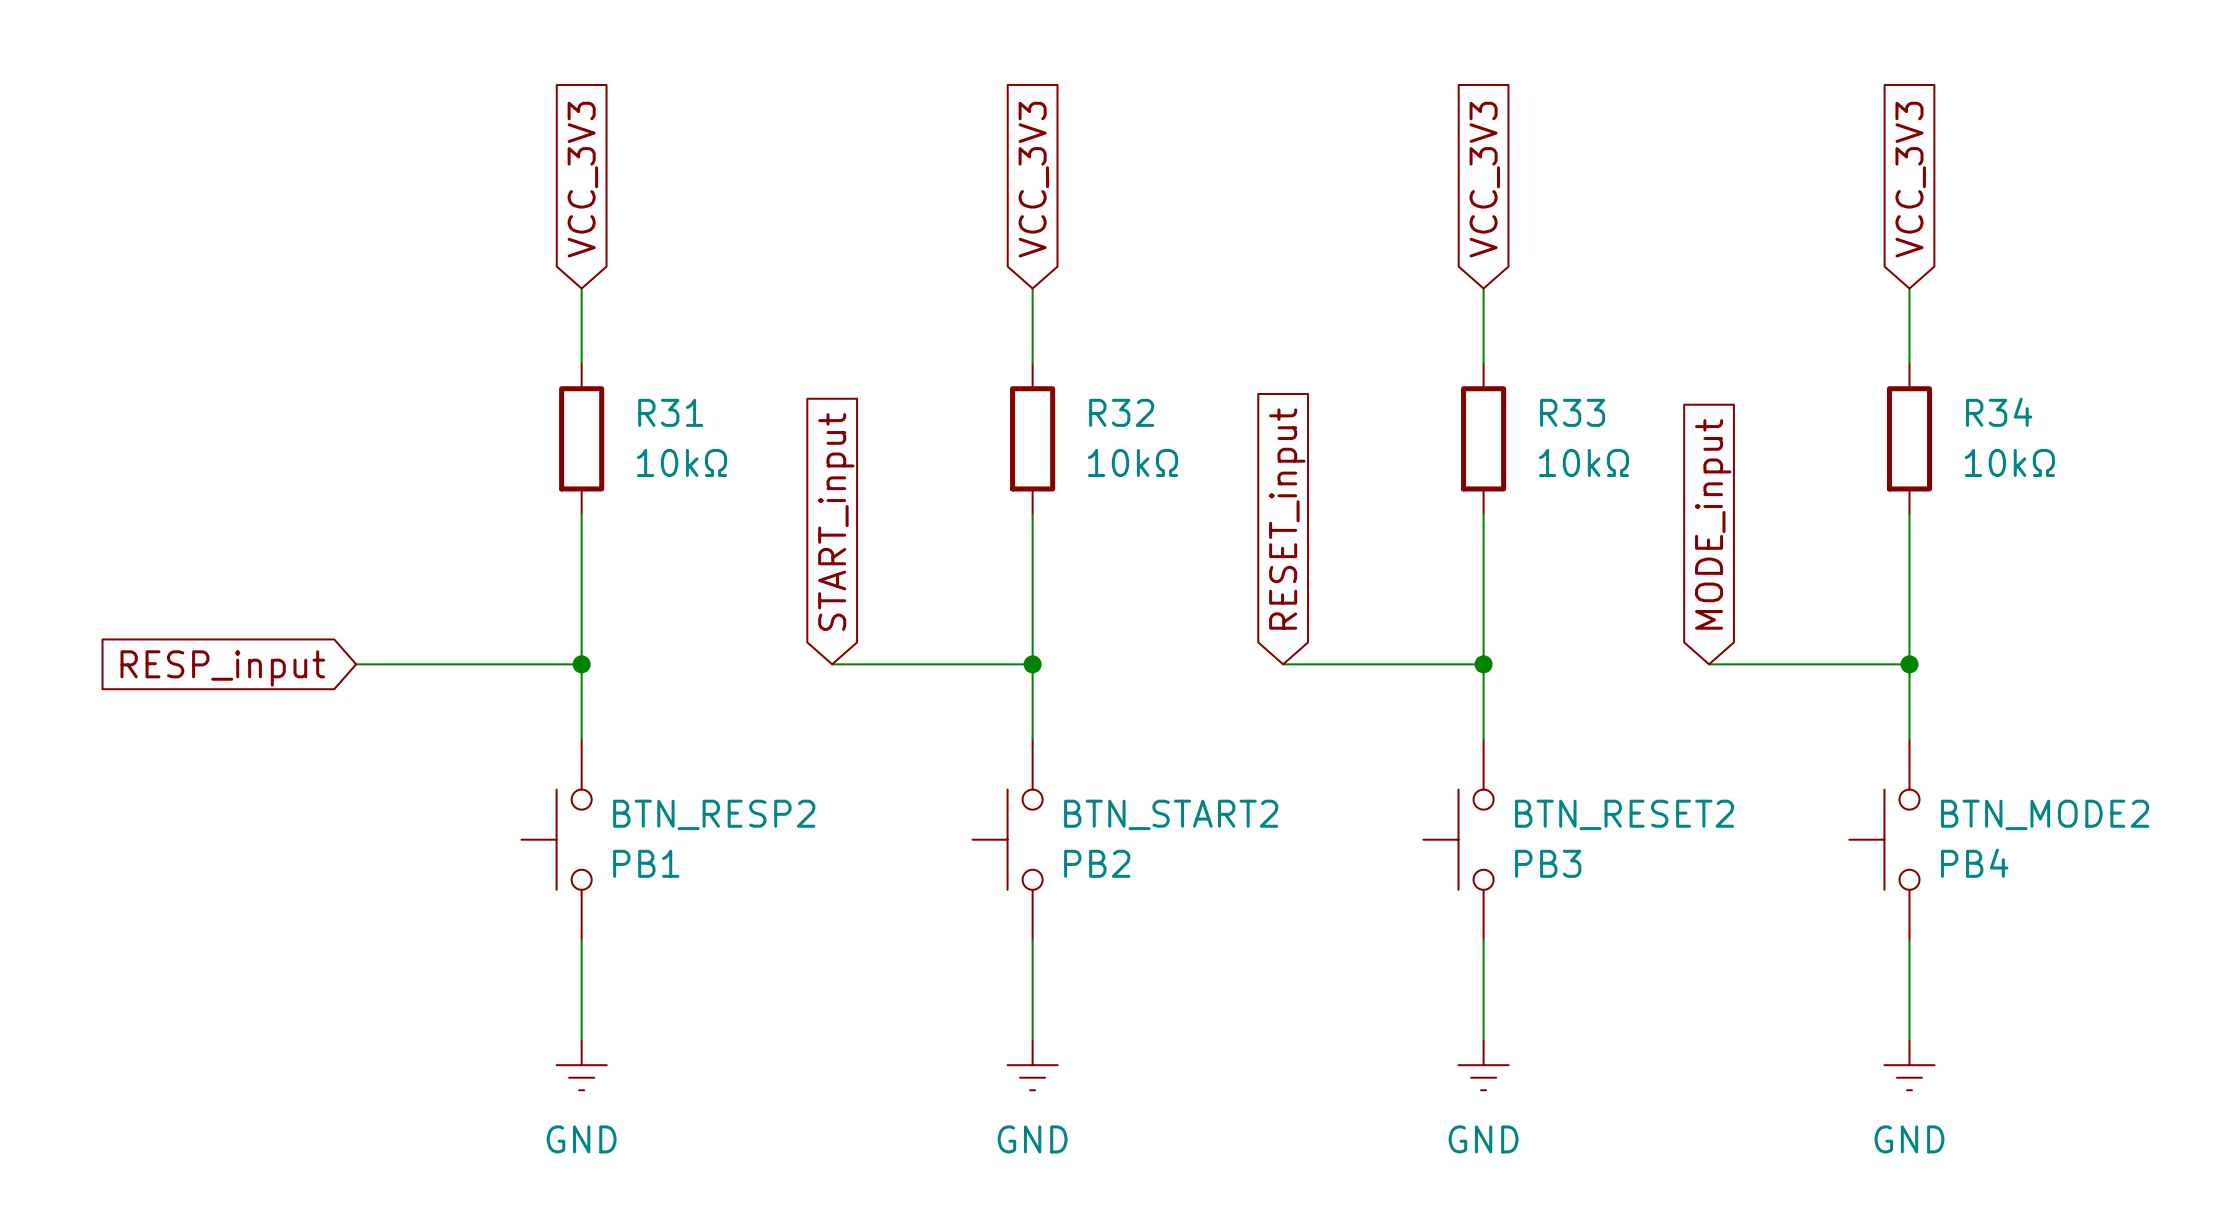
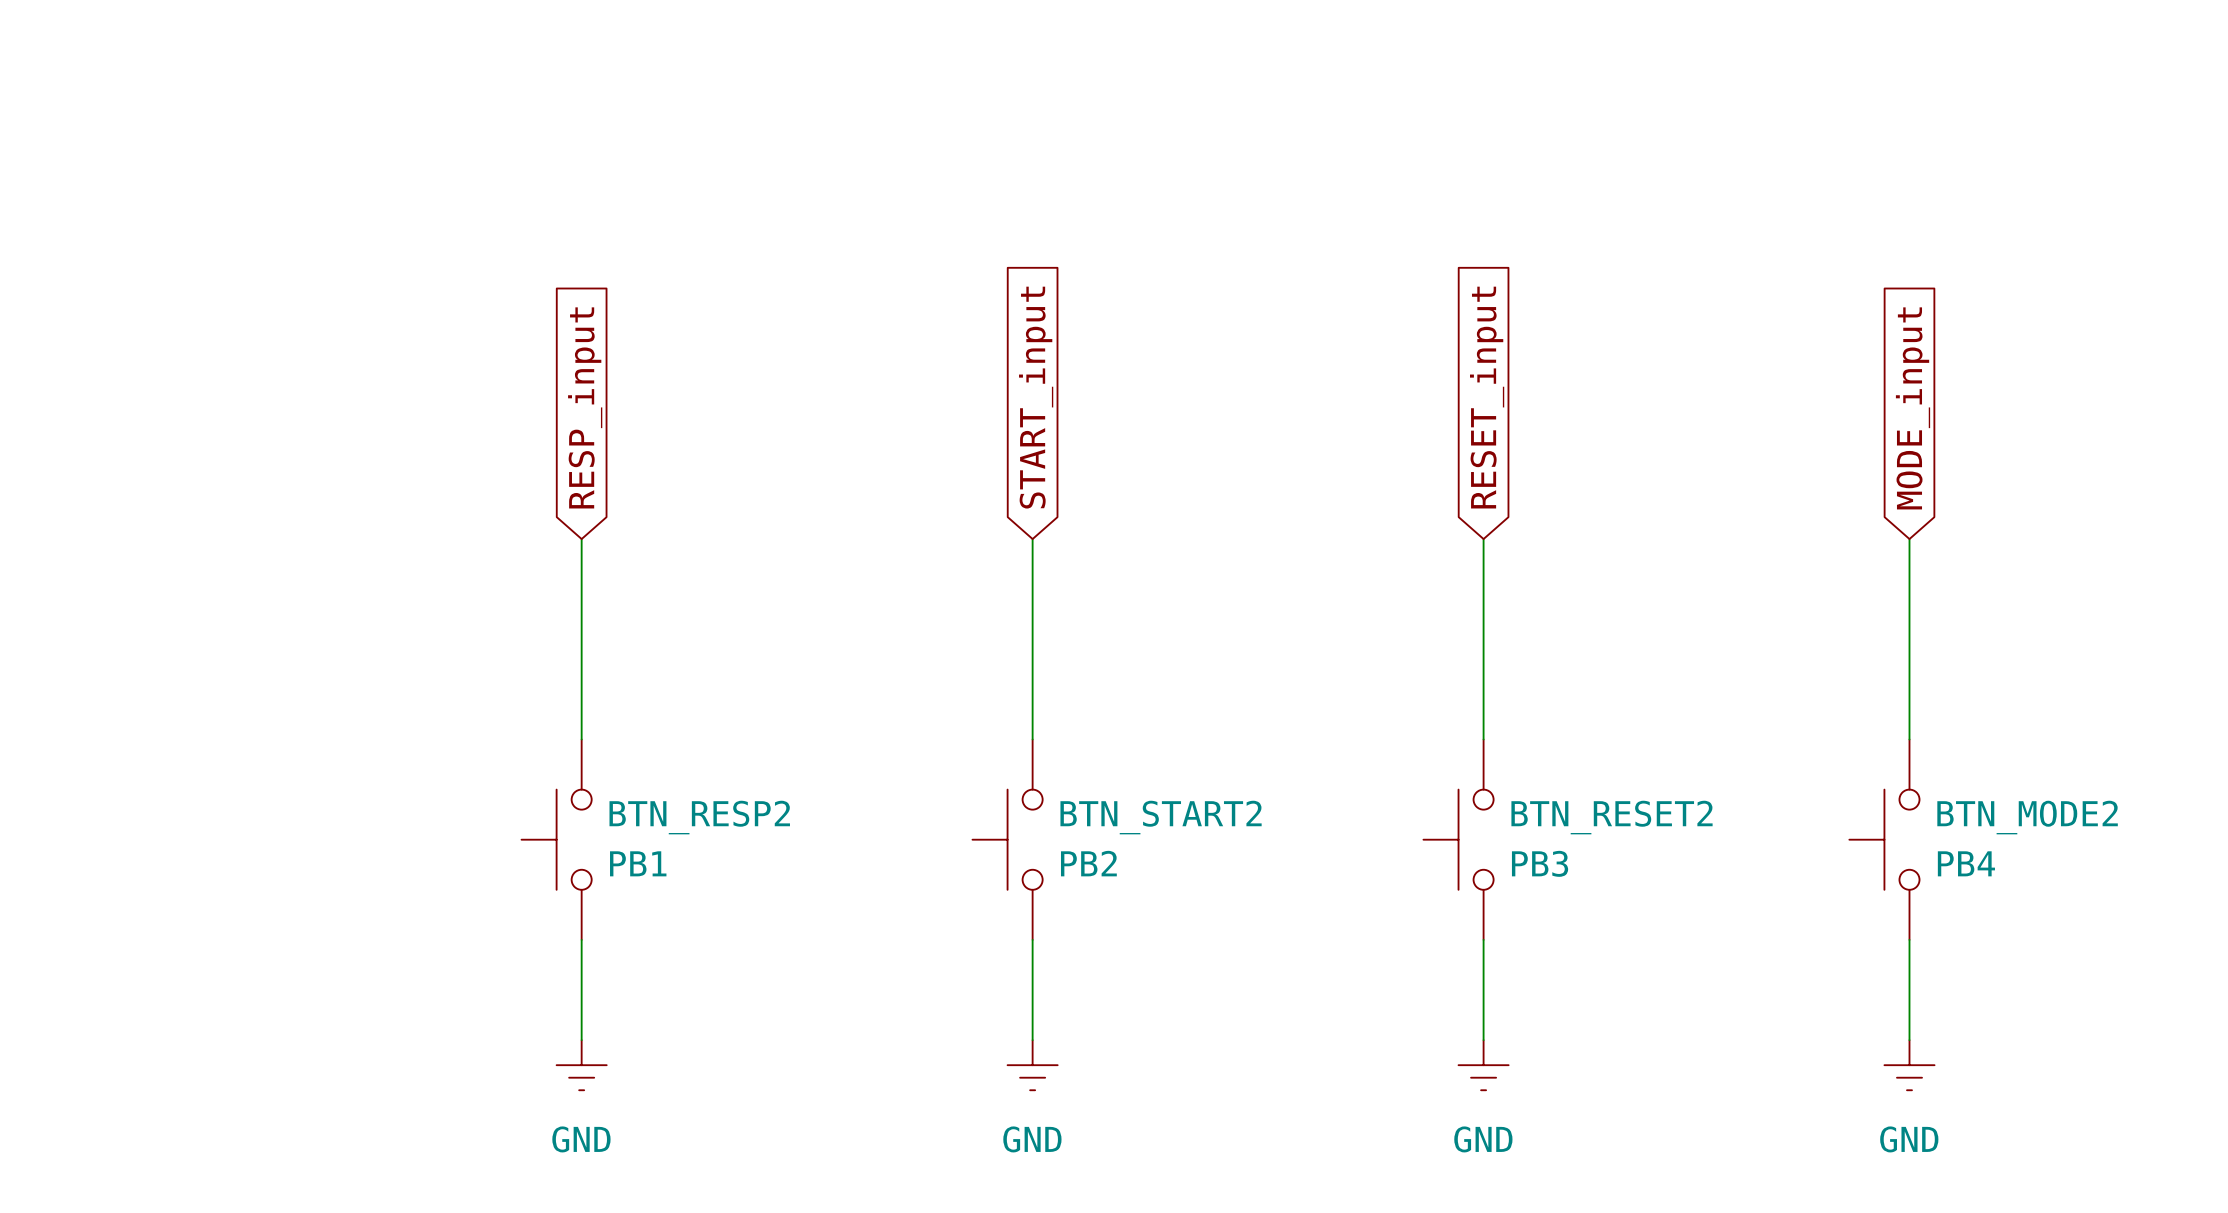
global label: VCC_3V3 (582, 179) -> none
global label: VCC_3V3 (1033, 179) -> none
global label: VCC_3V3 (1484, 179) -> none
global label: VCC_3V3 (1910, 179) -> none
wire: (581, 288) (581, 363) -> none
wire: (1032, 288) (1032, 363) -> none
wire: (1483, 288) (1483, 363) -> none
wire: (1909, 288) (1909, 363) -> none
R31: 10kΩ (581, 438) -> none
R32: 10kΩ (1032, 438) -> none
R33: 10kΩ (1483, 438) -> none
R34: 10kΩ (1909, 438) -> none
wire: (581, 514) (581, 539) -> none
wire: (1032, 514) (1032, 539) -> none
wire: (1483, 514) (1483, 539) -> none
wire: (1909, 514) (1909, 539) -> none
global label position: RESET_input (1287, 519) -> RESET_input (1487, 397)
global label position: START_input (836, 522) -> START_input (1036, 397)
global label position: MODE_input (1713, 524) -> MODE_input (1913, 408)
wire: (356, 664) (581, 664) -> none
junction: (581, 664) -> none
wire: (832, 664) (1032, 664) -> none
junction: (1032, 664) -> none
wire: (1283, 664) (1483, 664) -> none
junction: (1483, 664) -> none
wire: (1709, 664) (1909, 664) -> none
junction: (1909, 664) -> none
global label rotation: 0° (222, 668) -> 90° clockwise (585, 407)
global label position: RESP_input (222, 668) -> RESP_input (585, 407)

